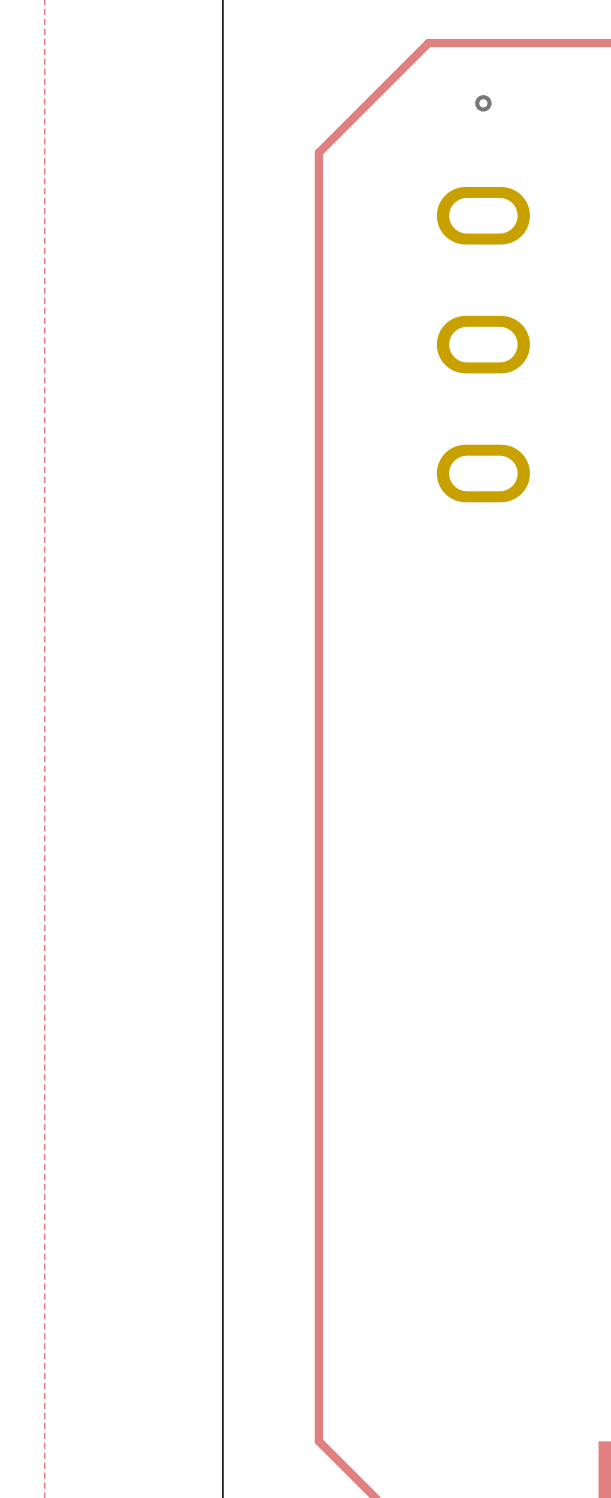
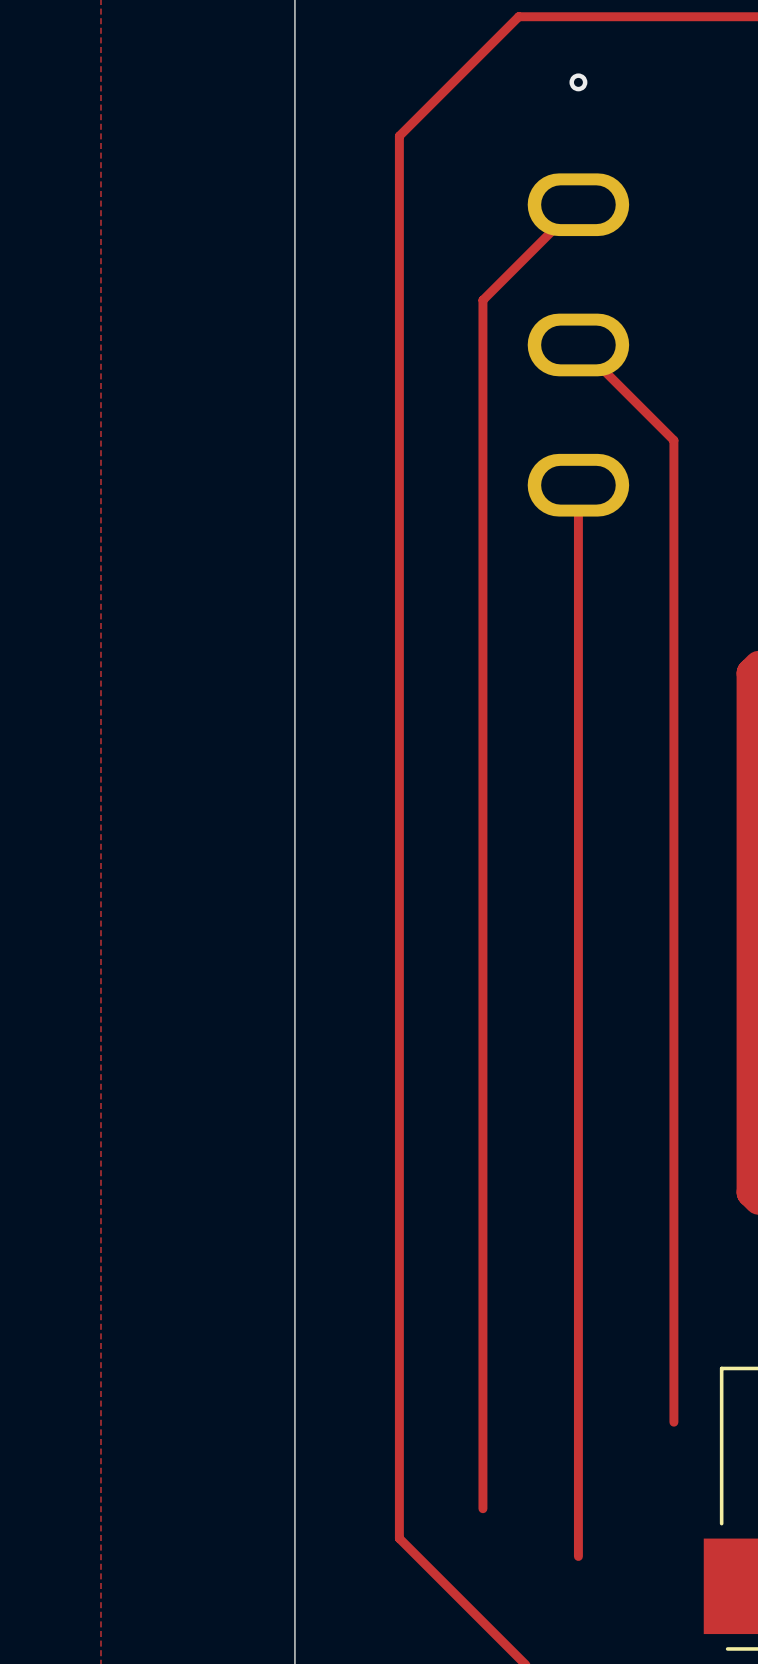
track: none -> (578, 204) (482, 300) (482, 1508)
track: none -> (578, 344) (673, 440) (673, 1422)
track: none -> (578, 485) (578, 1556)

